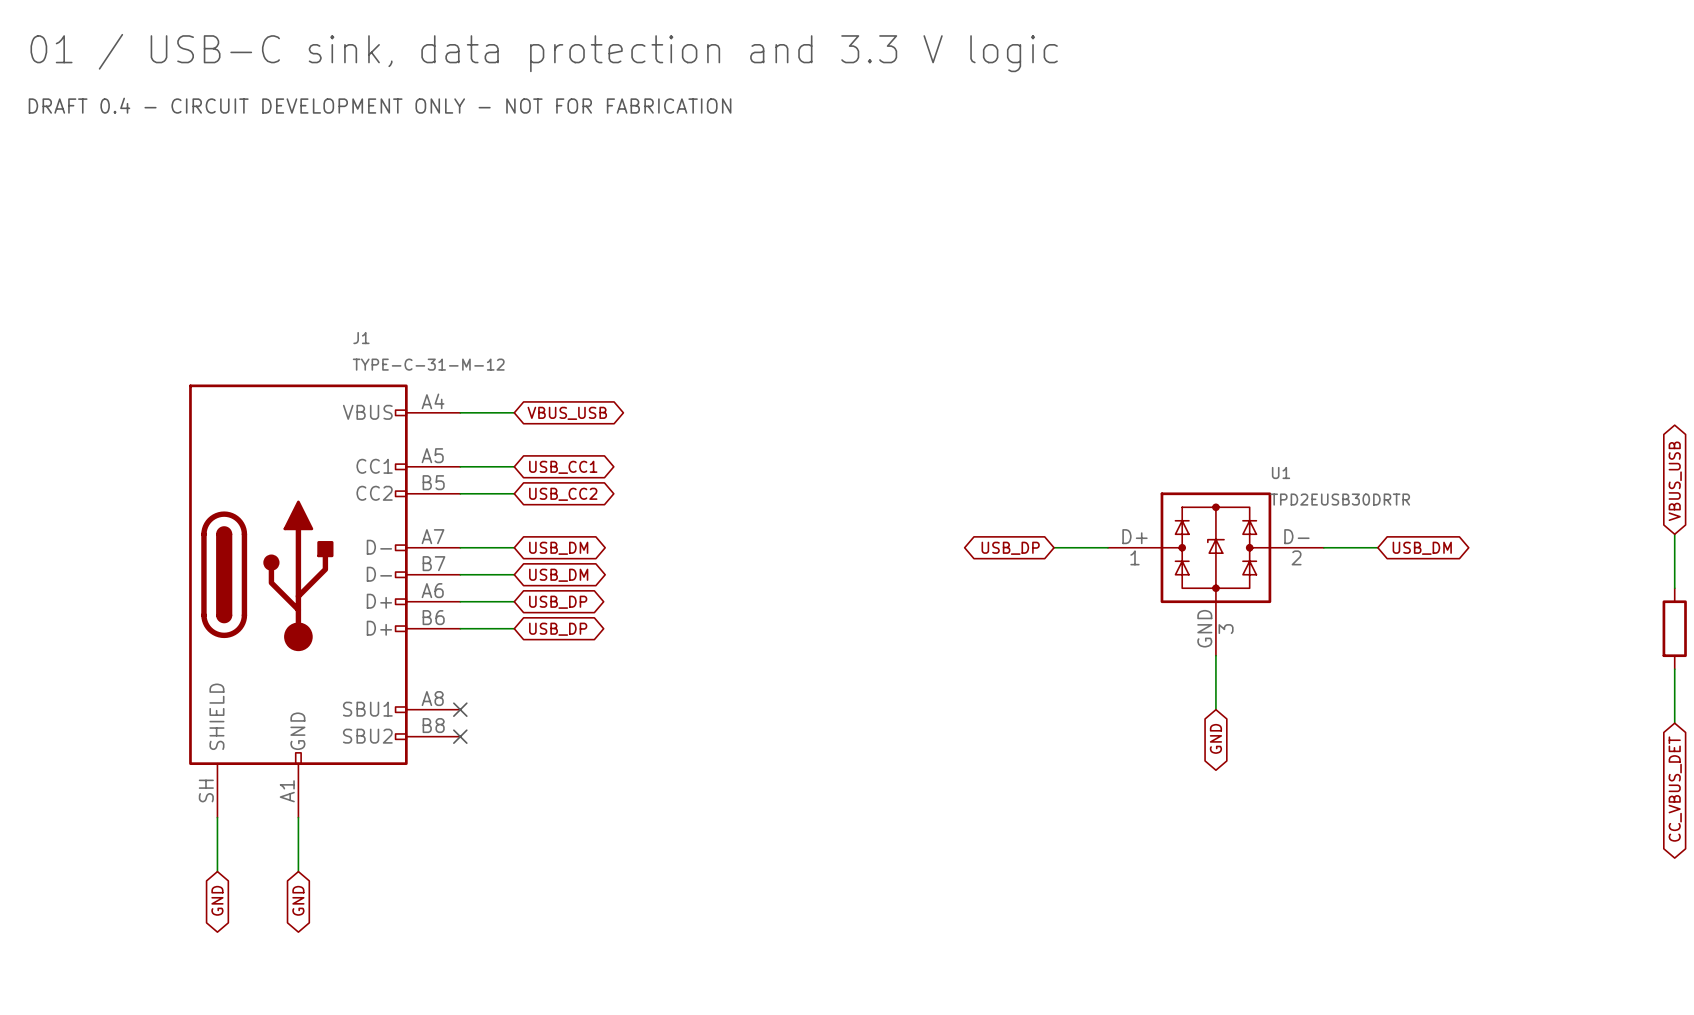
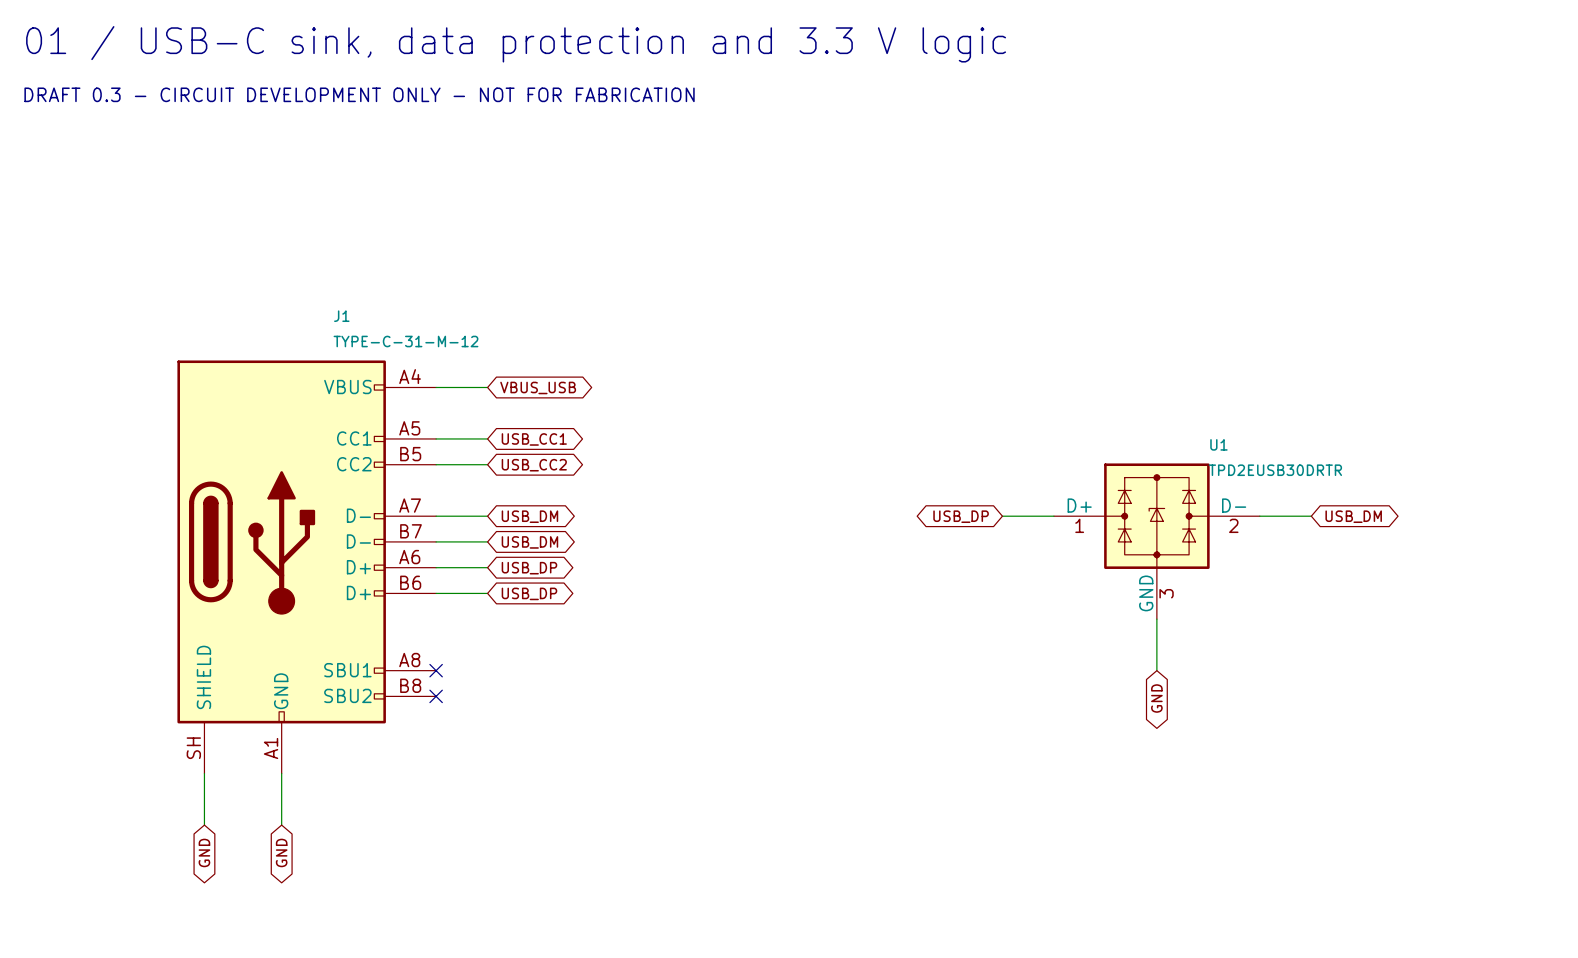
text: DRAFT 0.4 - CIRCUIT DEVELOPMENT ONLY - NOT FOR FABRICATION (380, 105) -> DRAFT 0.3 - CIRCUIT DEVELOPMENT ONLY - NOT FOR FABRICATION (359, 94)

